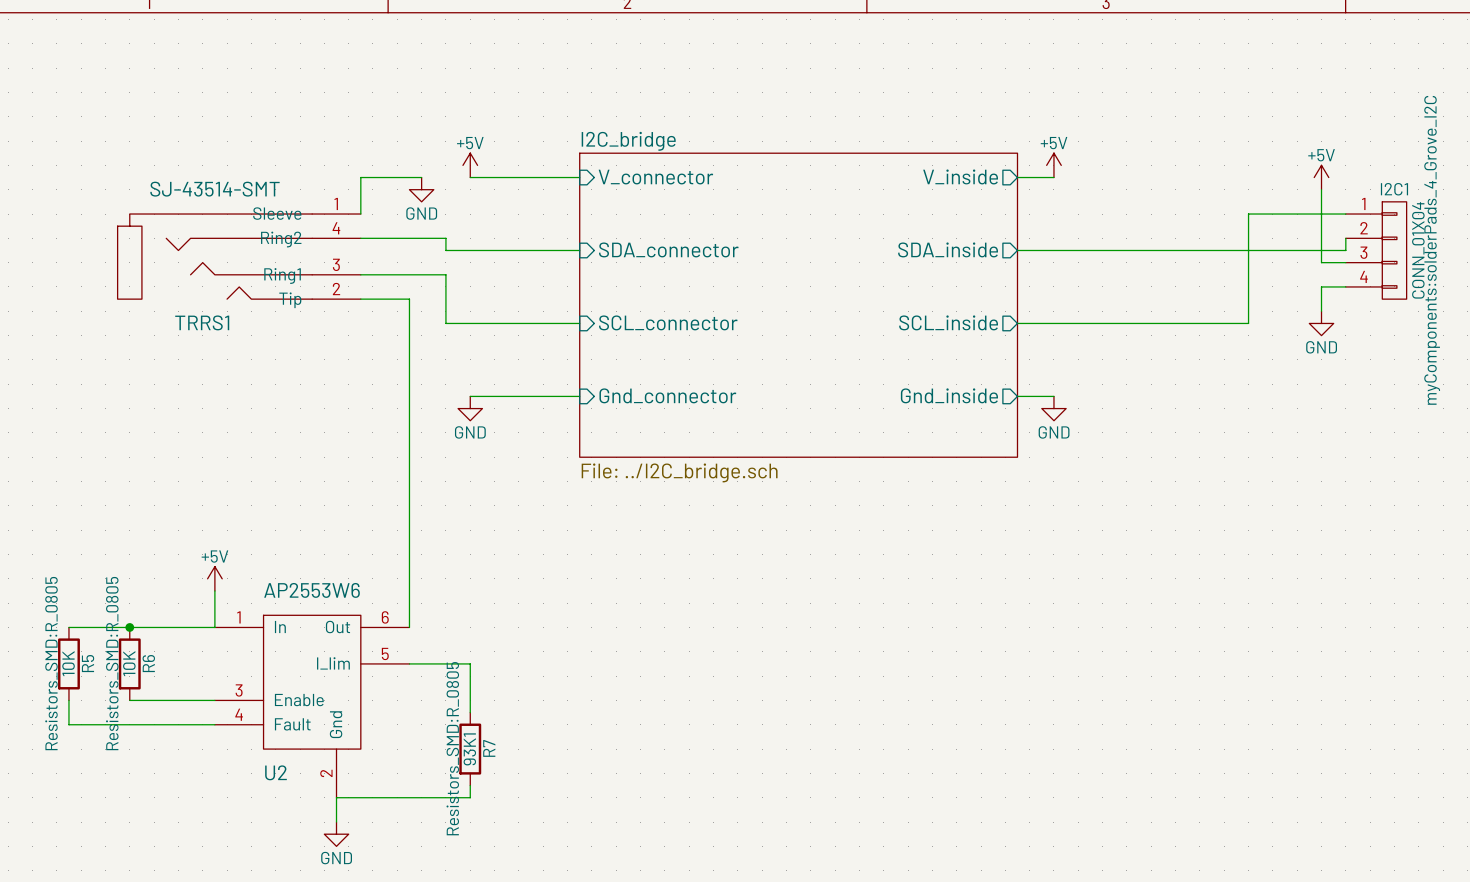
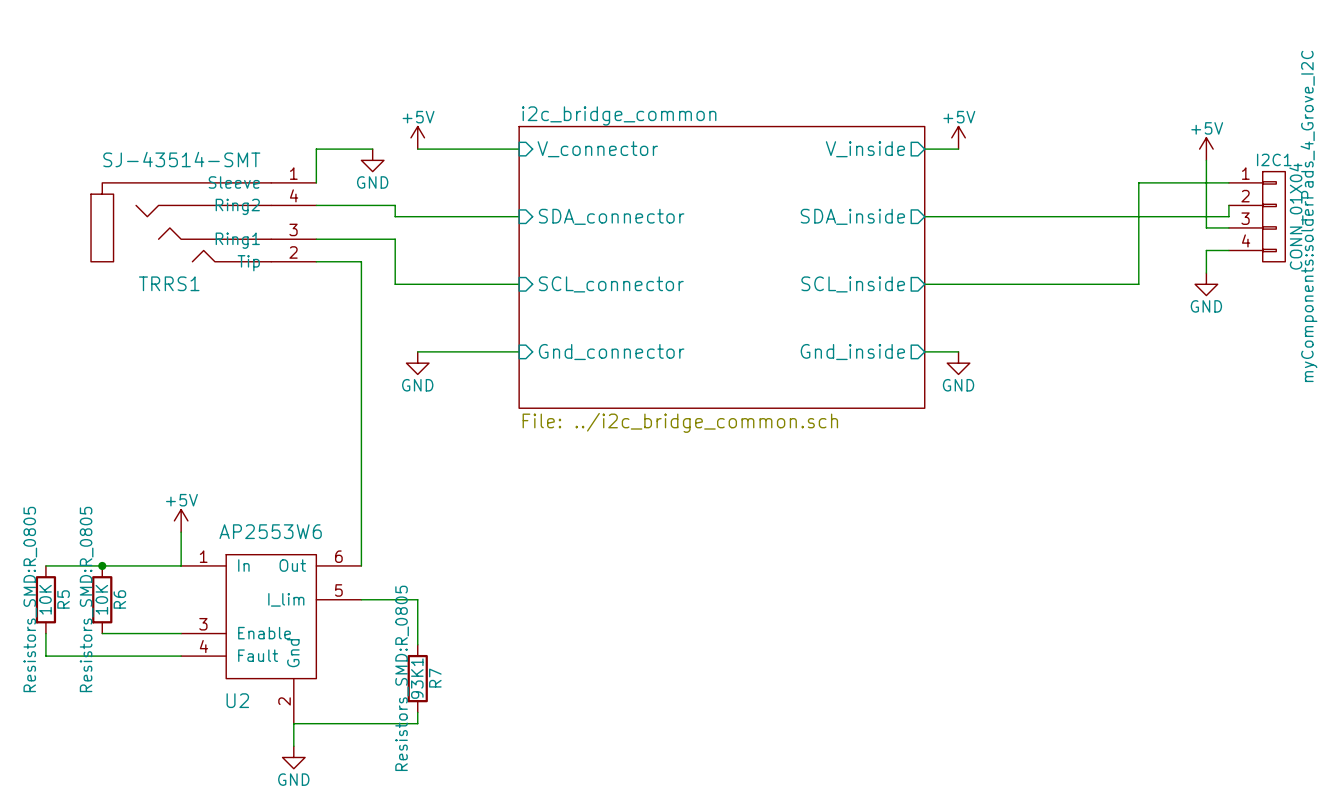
sheet I2C_bridge name: I2C_bridge (628, 141) -> i2c_bridge_common (619, 115)
sheet I2C_bridge value: File: ../I2C_bridge.sch (679, 472) -> File: ../i2c_bridge_common.sch (680, 422)

